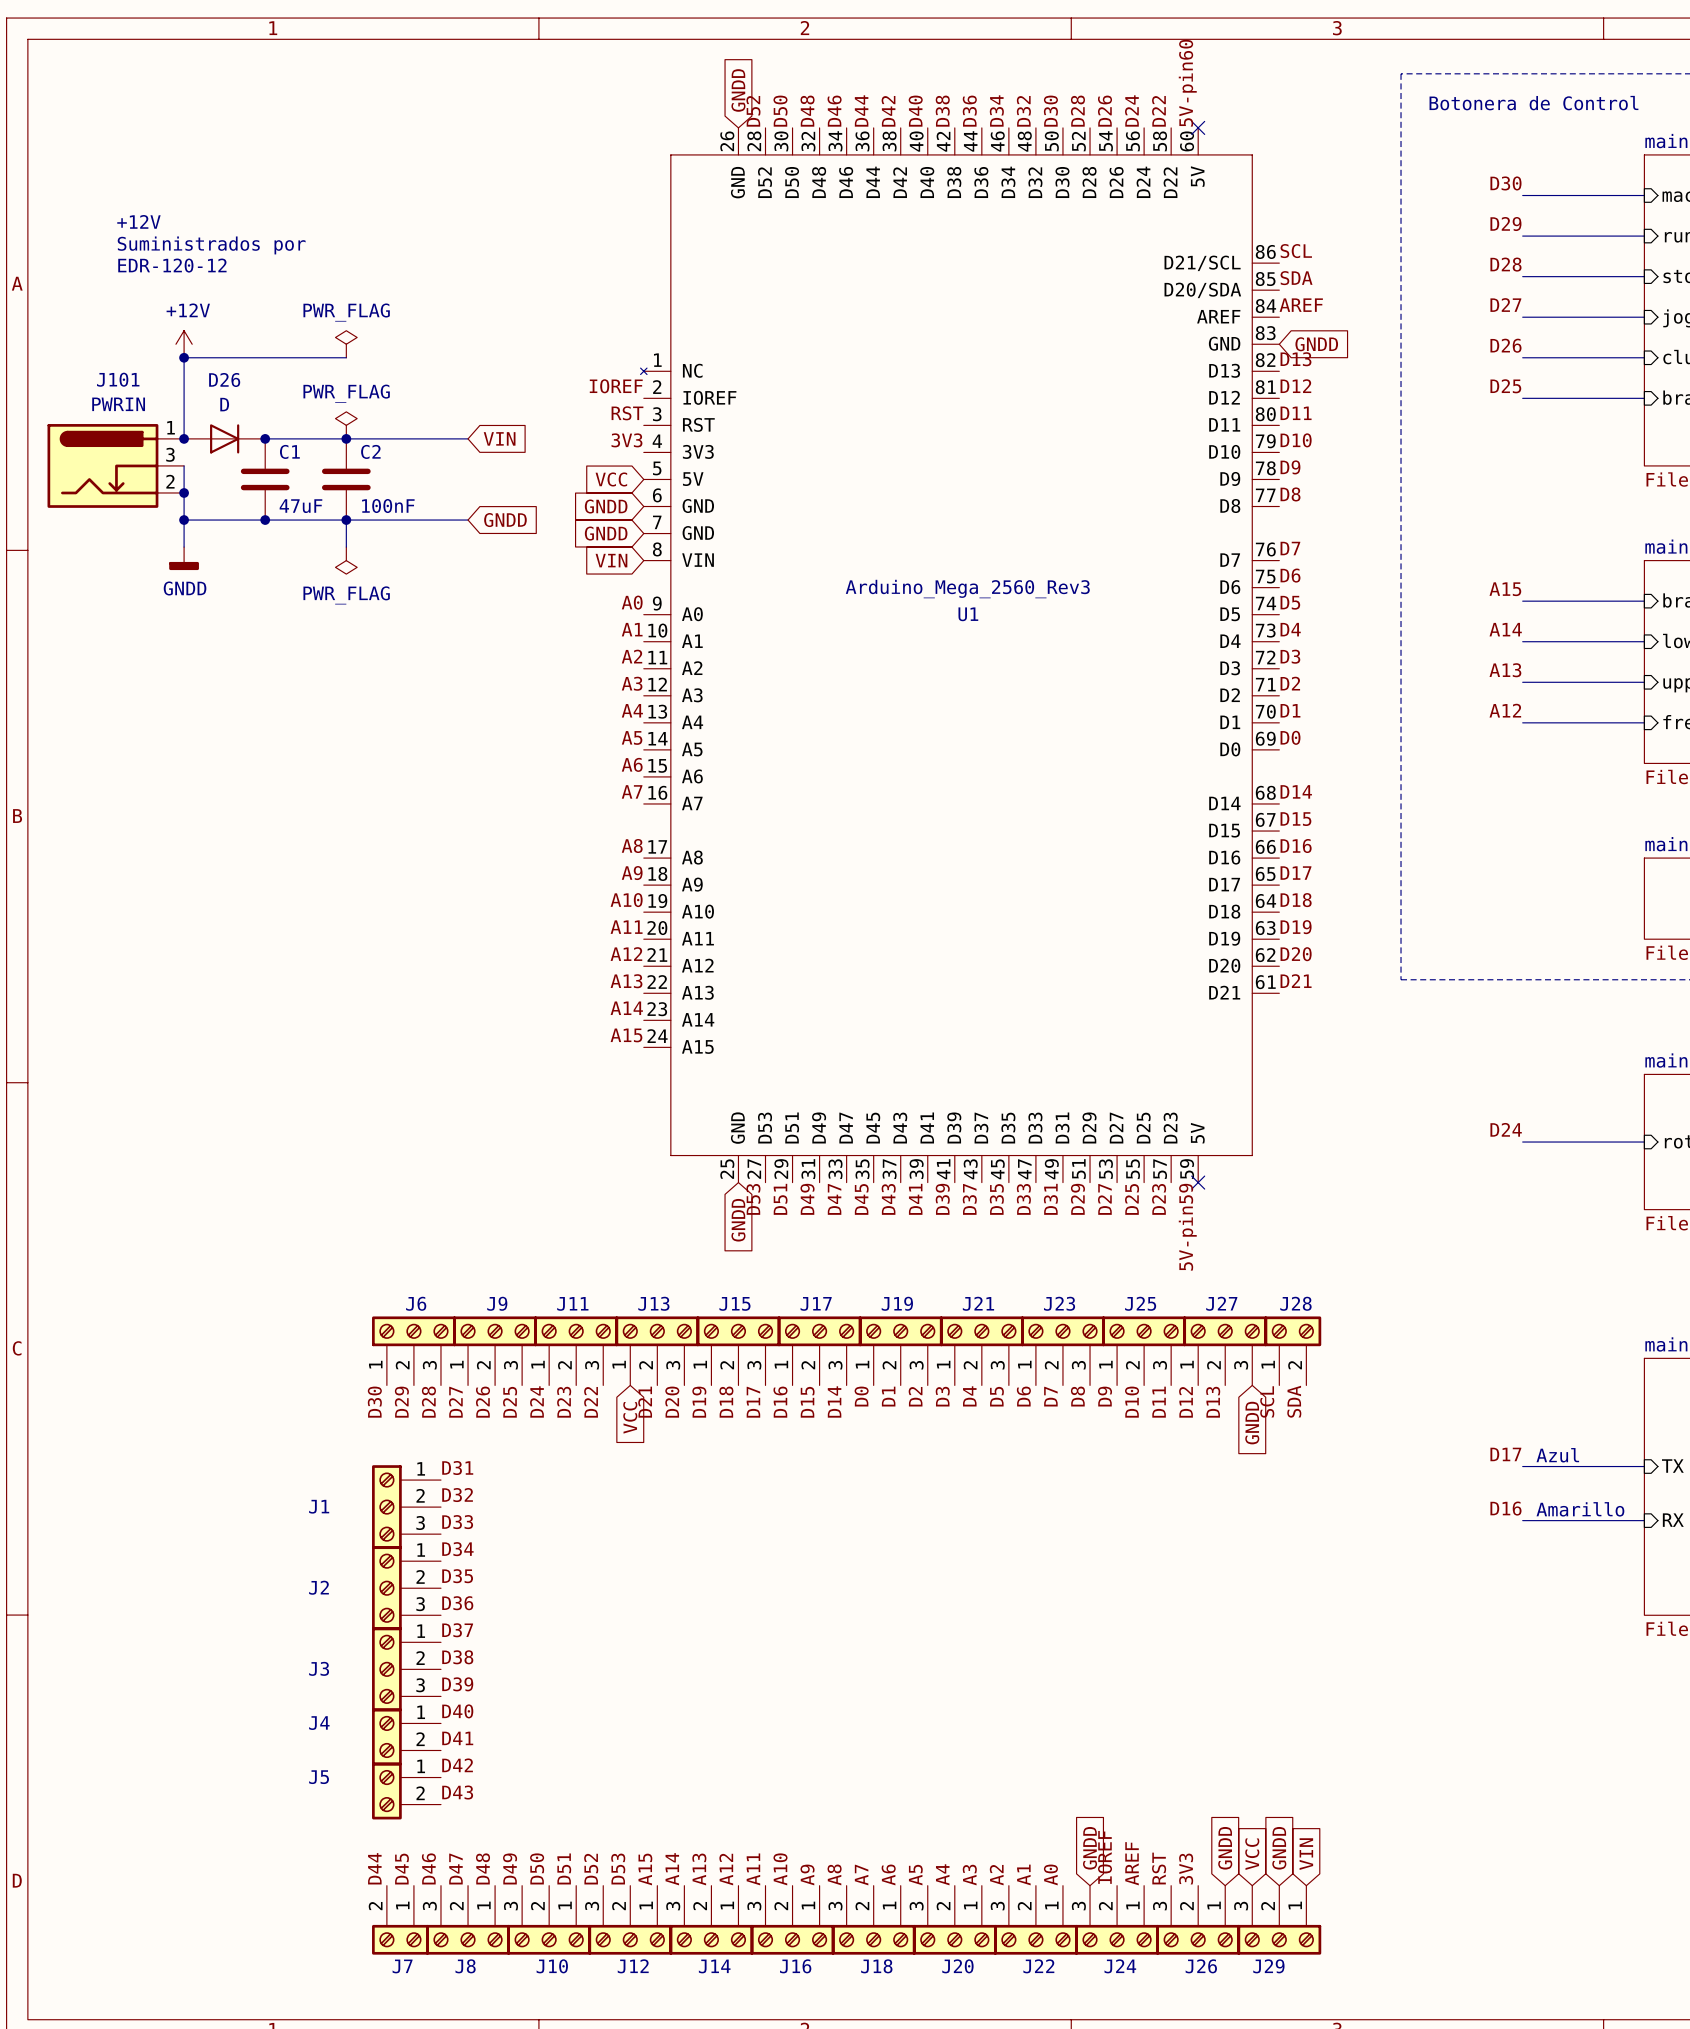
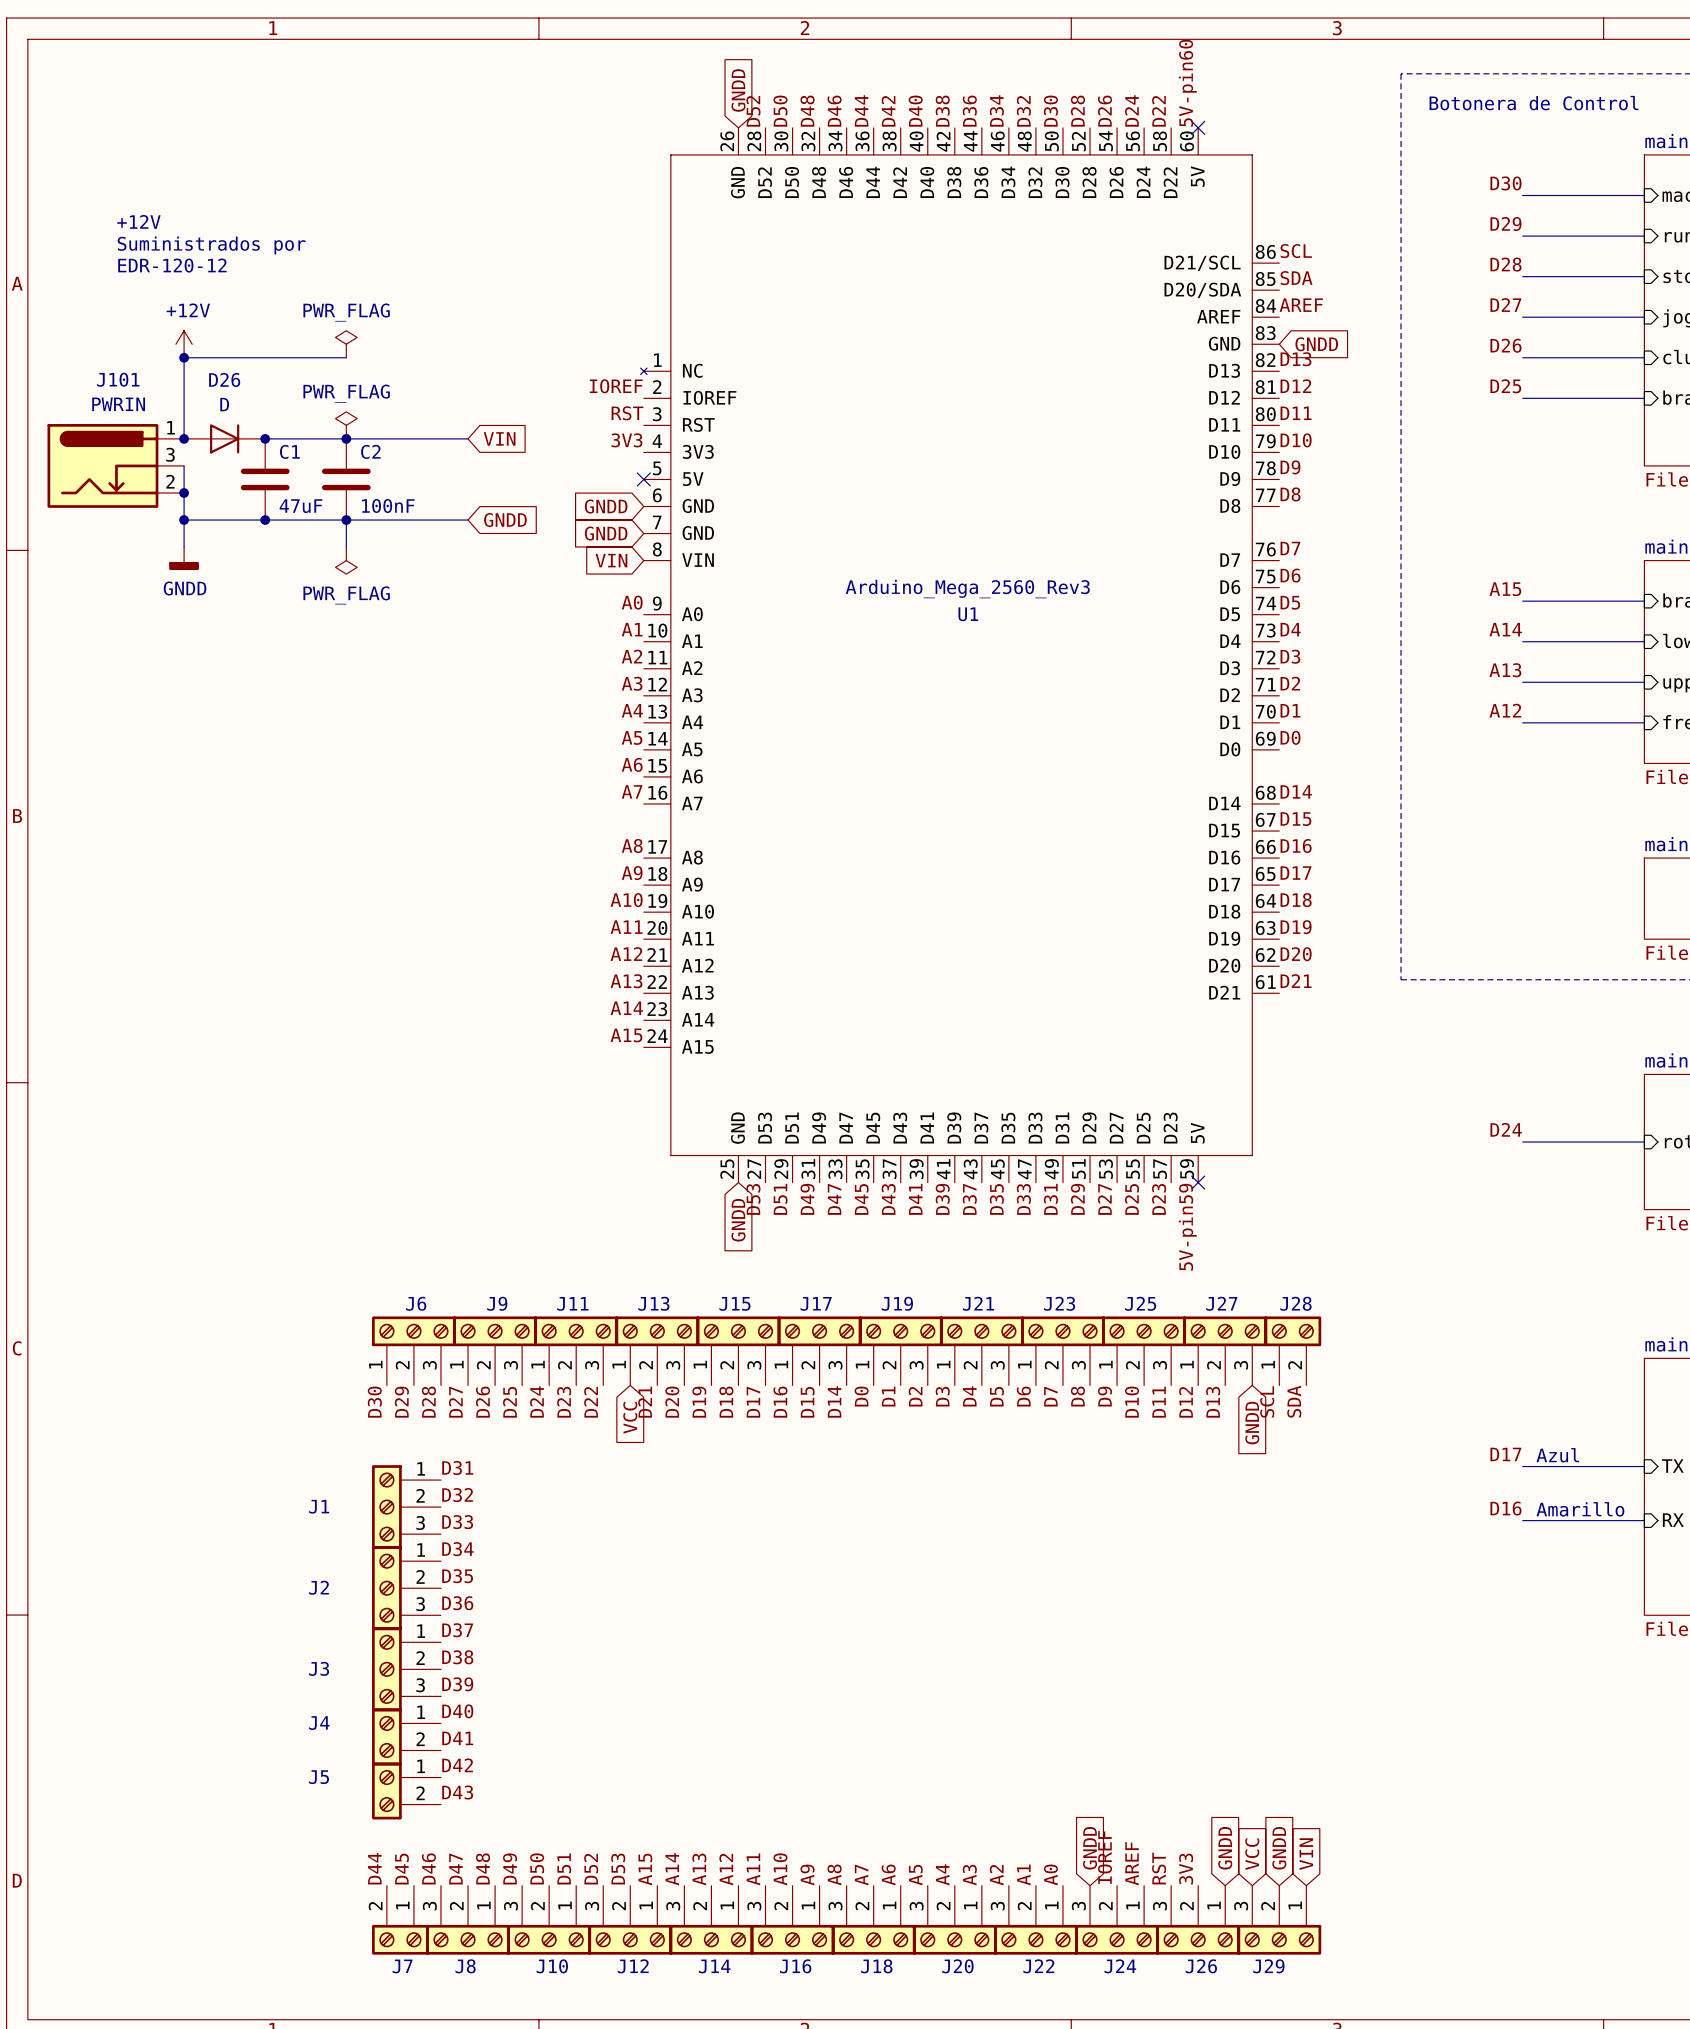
global label: VCC (611, 479) -> none
no-connect mark: none -> (643, 479)

